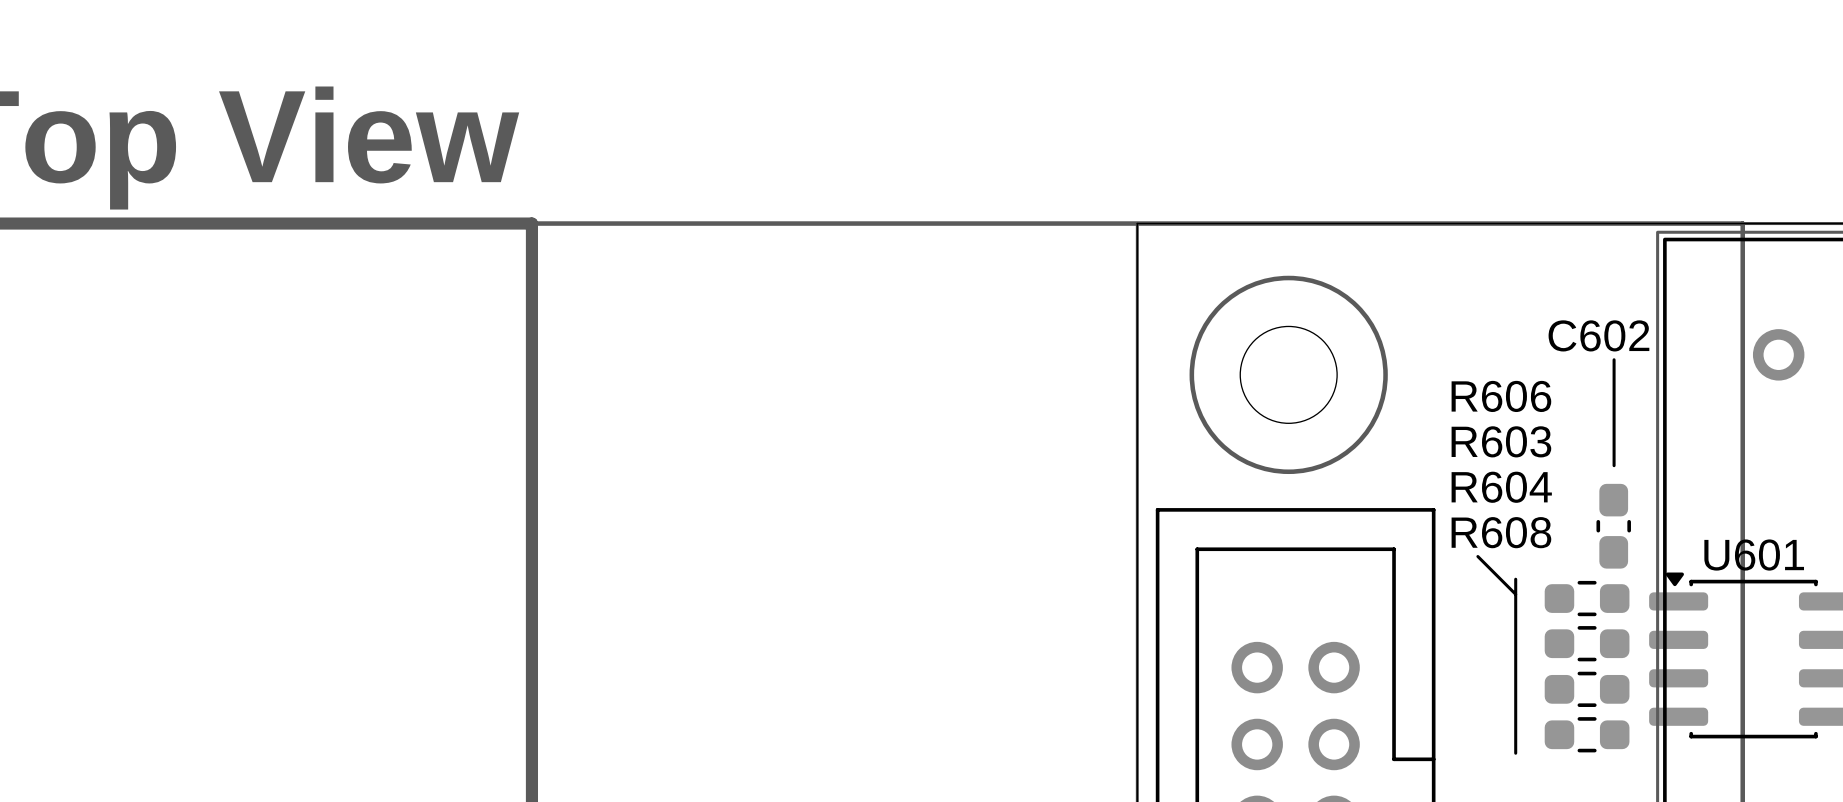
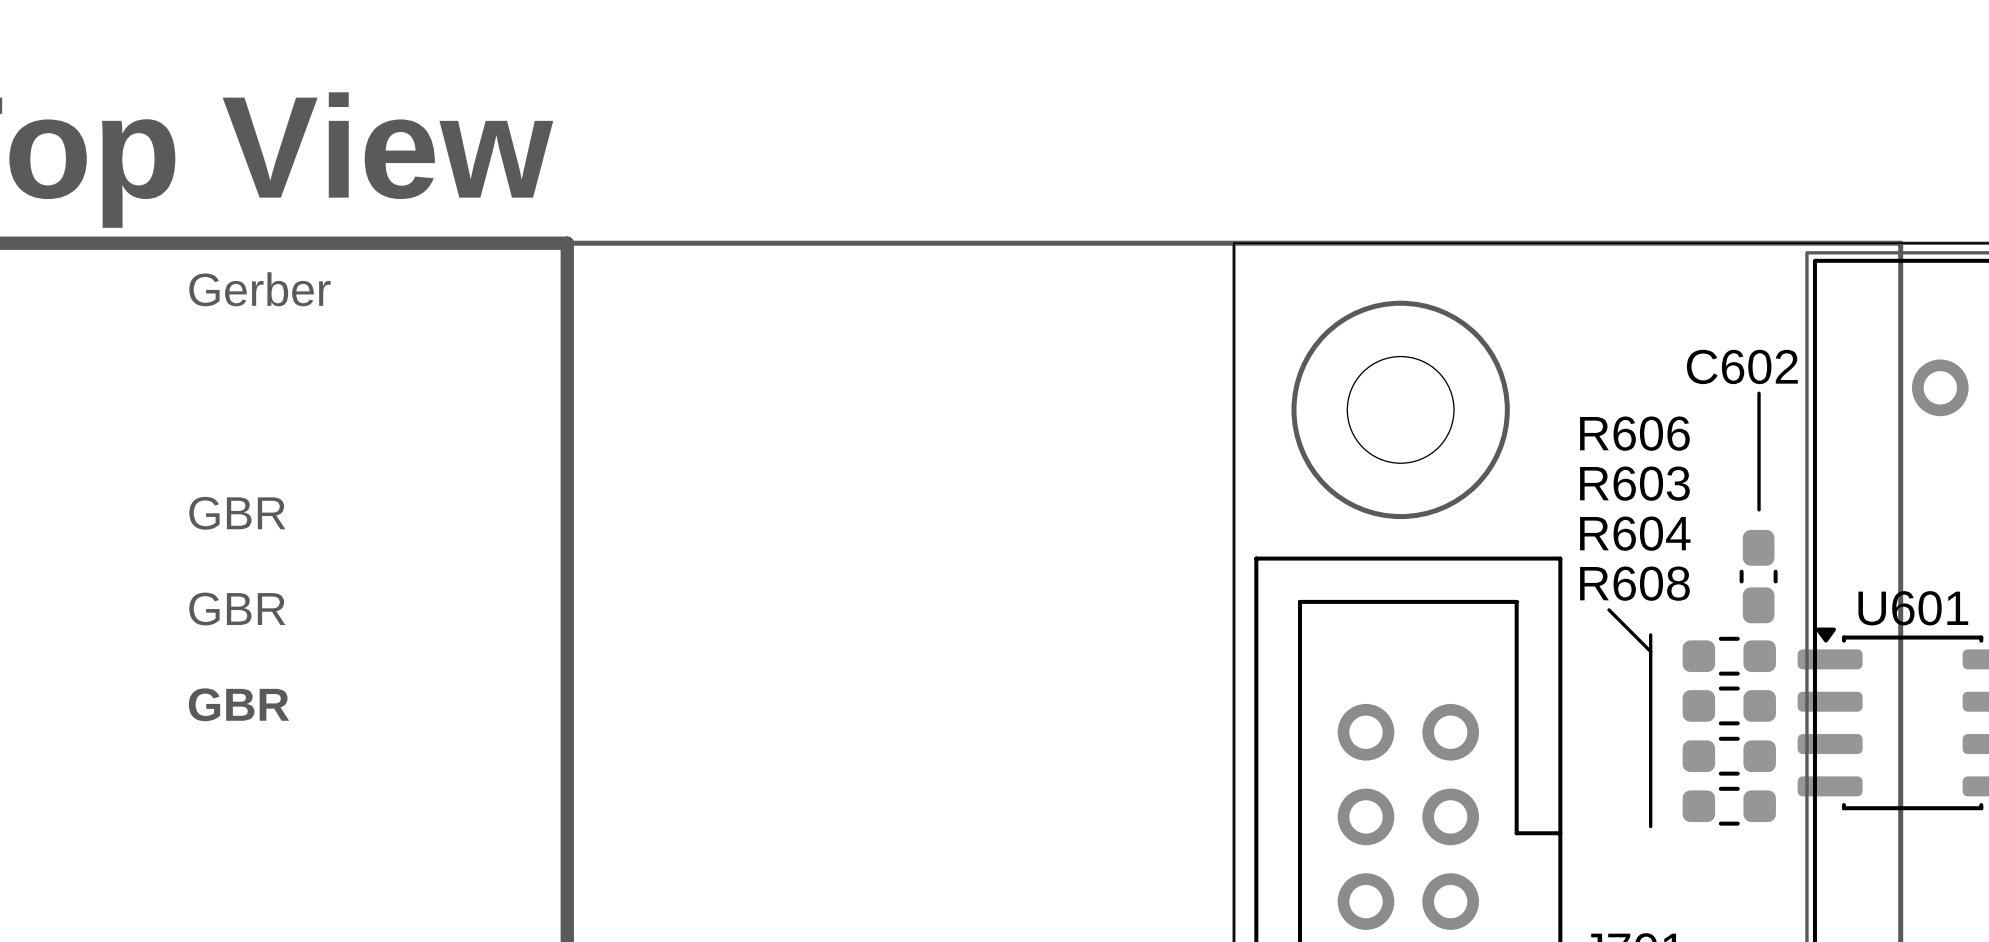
text: none -> Gerber (259, 289)
text: none -> GBR (237, 513)
text: none -> GBR (237, 609)
text: none -> GBR (239, 704)

